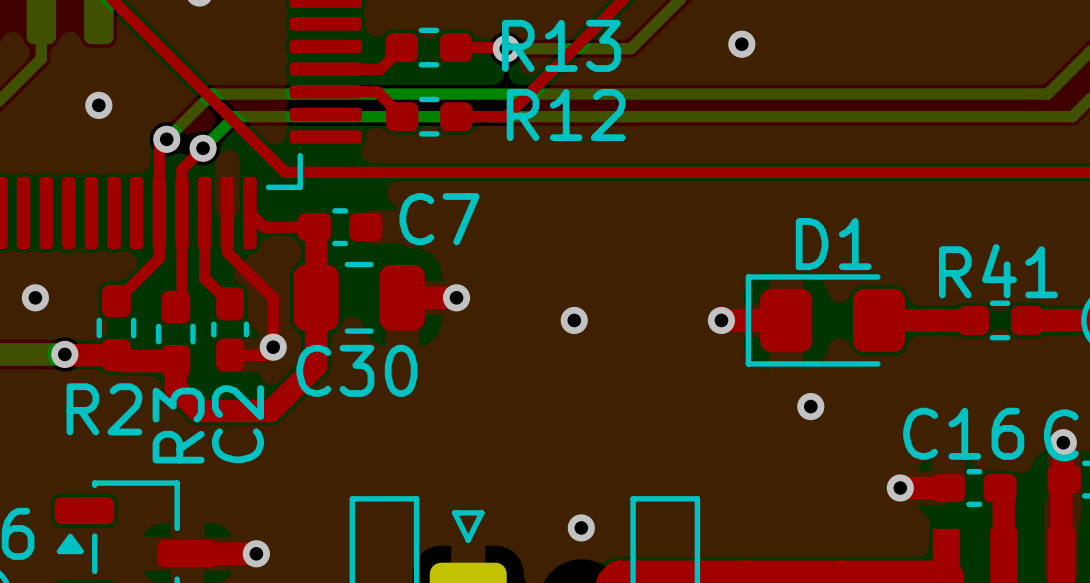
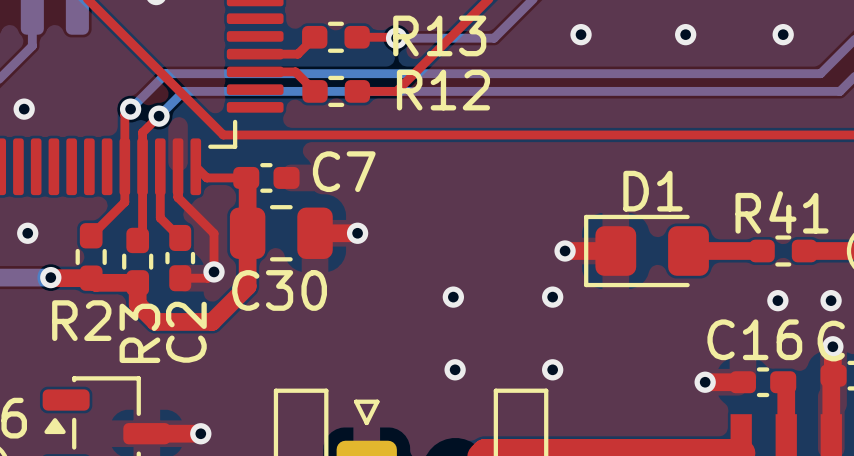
via: none -> (685, 34)
via: none -> (783, 34)
via position: (98, 105) -> (24, 109)
via position: (574, 320) -> (453, 297)
via: none -> (552, 297)
via: none -> (777, 300)
via: none -> (831, 300)
via: (810, 406) -> none
via: none -> (552, 369)
via position: (581, 527) -> (455, 369)

